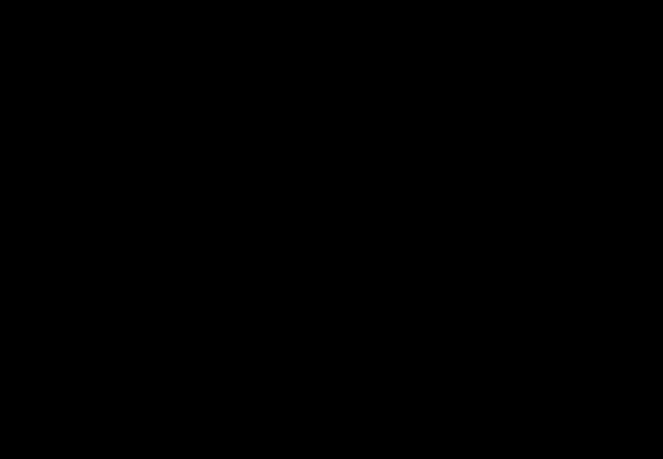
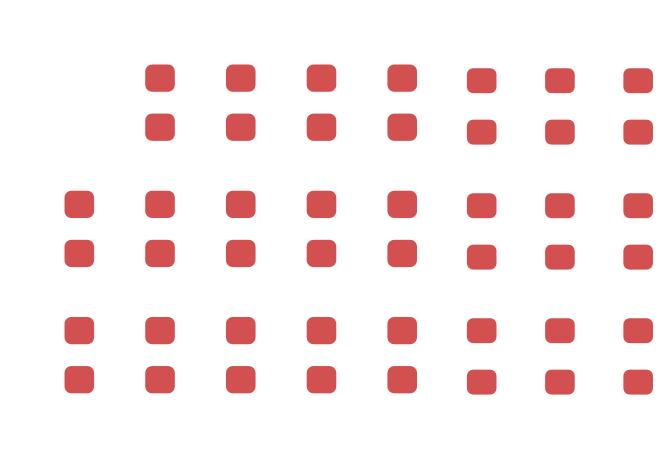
part: none -> (160, 102)
part: none -> (240, 102)
part: none -> (321, 102)
part: none -> (402, 102)
part: none -> (481, 106)
part: none -> (559, 106)
part: none -> (638, 106)
part: none -> (79, 228)
part: none -> (160, 228)
part: none -> (240, 228)
part: none -> (321, 228)
part: none -> (402, 228)
part: none -> (481, 231)
part: none -> (559, 231)
part: none -> (638, 231)
part: none -> (79, 355)
part: none -> (160, 355)
part: none -> (240, 355)
part: none -> (321, 355)
part: none -> (402, 355)
part: none -> (481, 356)
part: none -> (559, 356)
part: none -> (638, 356)

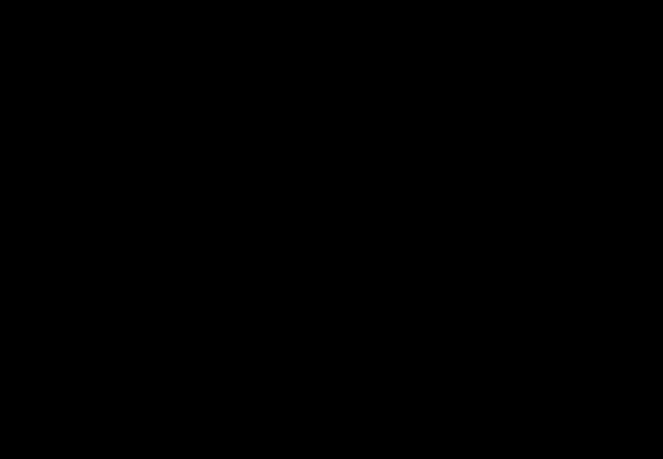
part: (160, 102) -> none
part: (240, 102) -> none
part: (321, 102) -> none
part: (402, 102) -> none
part: (481, 106) -> none
part: (559, 106) -> none
part: (638, 106) -> none
part: (79, 228) -> none
part: (160, 228) -> none
part: (240, 228) -> none
part: (321, 228) -> none
part: (402, 228) -> none
part: (481, 231) -> none
part: (559, 231) -> none
part: (638, 231) -> none
part: (79, 355) -> none
part: (160, 355) -> none
part: (240, 355) -> none
part: (321, 355) -> none
part: (402, 355) -> none
part: (481, 356) -> none
part: (559, 356) -> none
part: (638, 356) -> none

